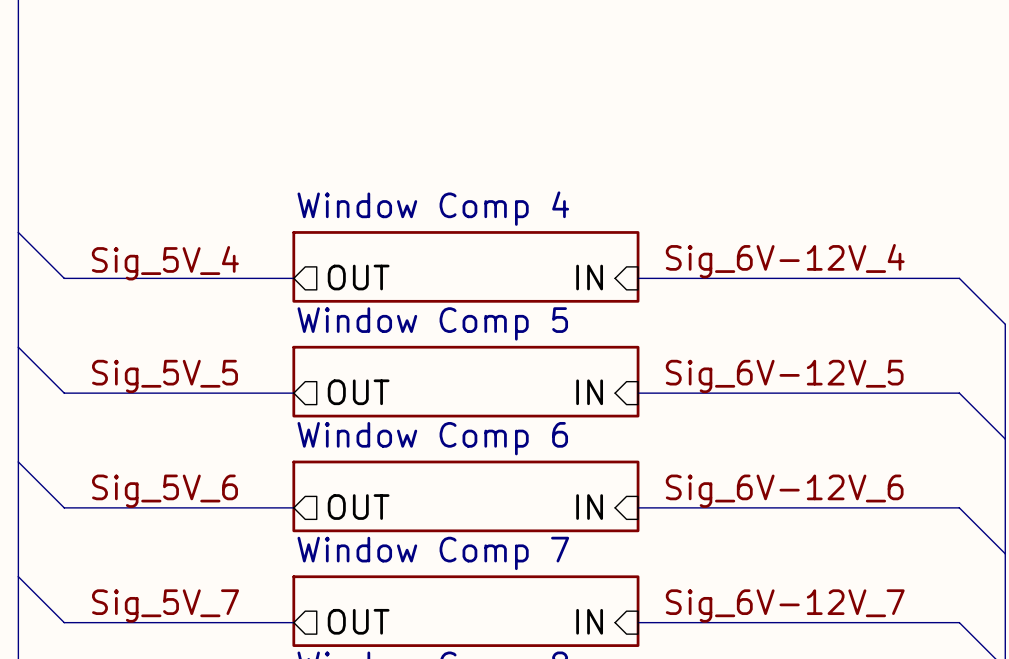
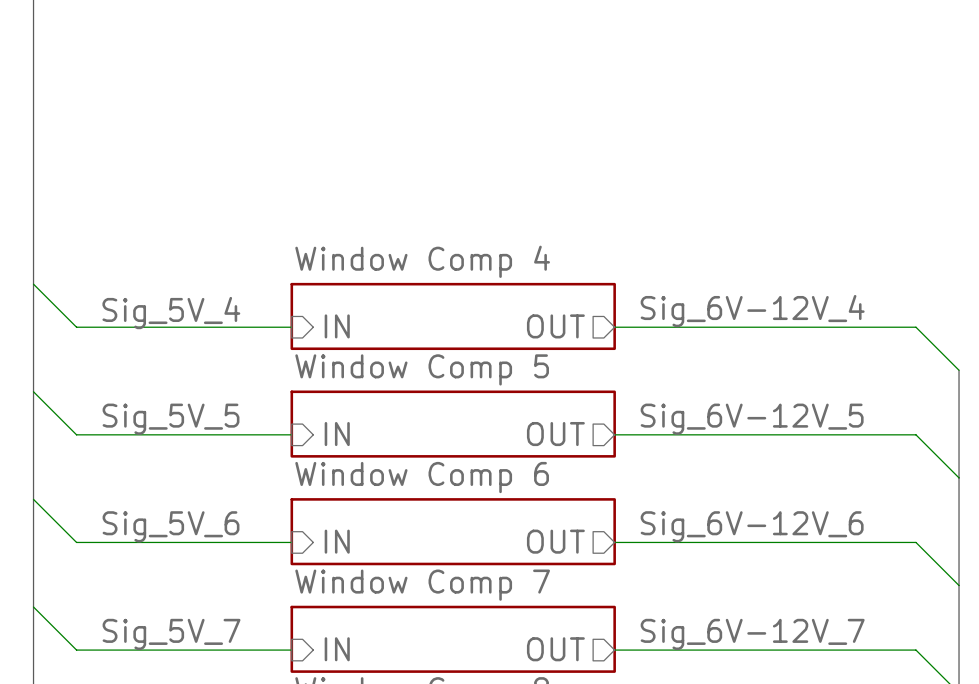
sheet pin shape: output (358, 277) -> input (337, 326)
sheet pin: OUT (358, 277) -> IN (337, 326)
sheet pin shape: input (589, 277) -> output (555, 326)
sheet pin: IN (589, 277) -> OUT (555, 326)
sheet pin shape: output (358, 392) -> input (337, 434)
sheet pin: OUT (358, 392) -> IN (337, 434)
sheet pin shape: input (589, 392) -> output (555, 434)
sheet pin: IN (589, 392) -> OUT (555, 434)
sheet pin shape: output (358, 507) -> input (337, 541)
sheet pin: OUT (358, 507) -> IN (337, 541)
sheet pin shape: input (589, 507) -> output (555, 541)
sheet pin: IN (589, 507) -> OUT (555, 541)
sheet pin shape: output (358, 621) -> input (337, 649)
sheet pin: OUT (358, 621) -> IN (337, 649)
sheet pin shape: input (589, 621) -> output (555, 649)
sheet pin: IN (589, 621) -> OUT (555, 649)

